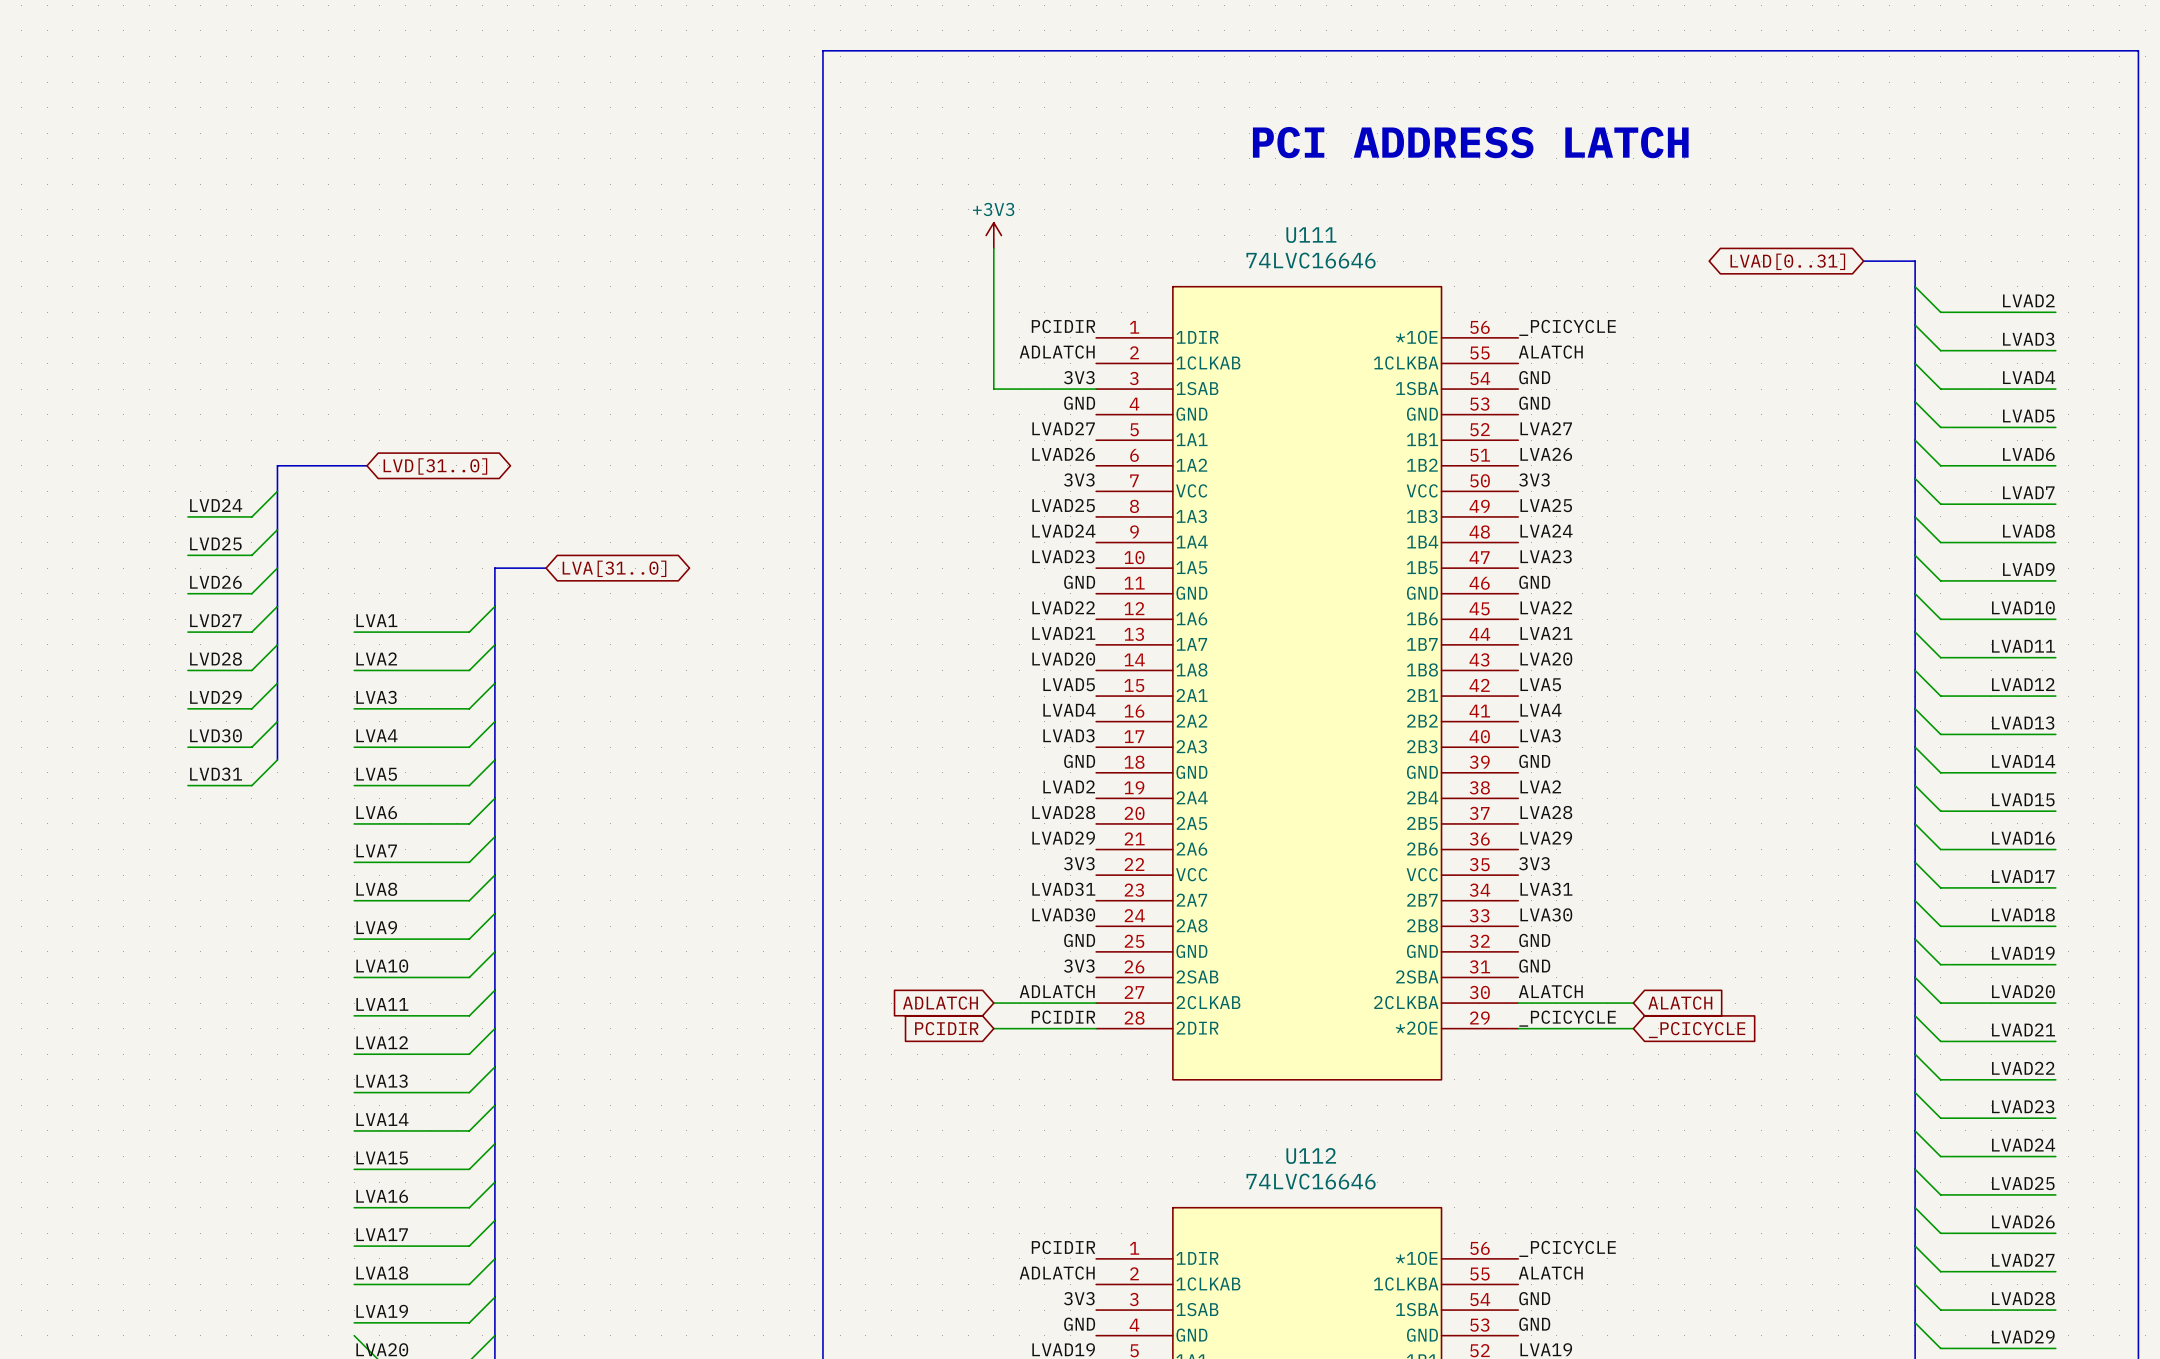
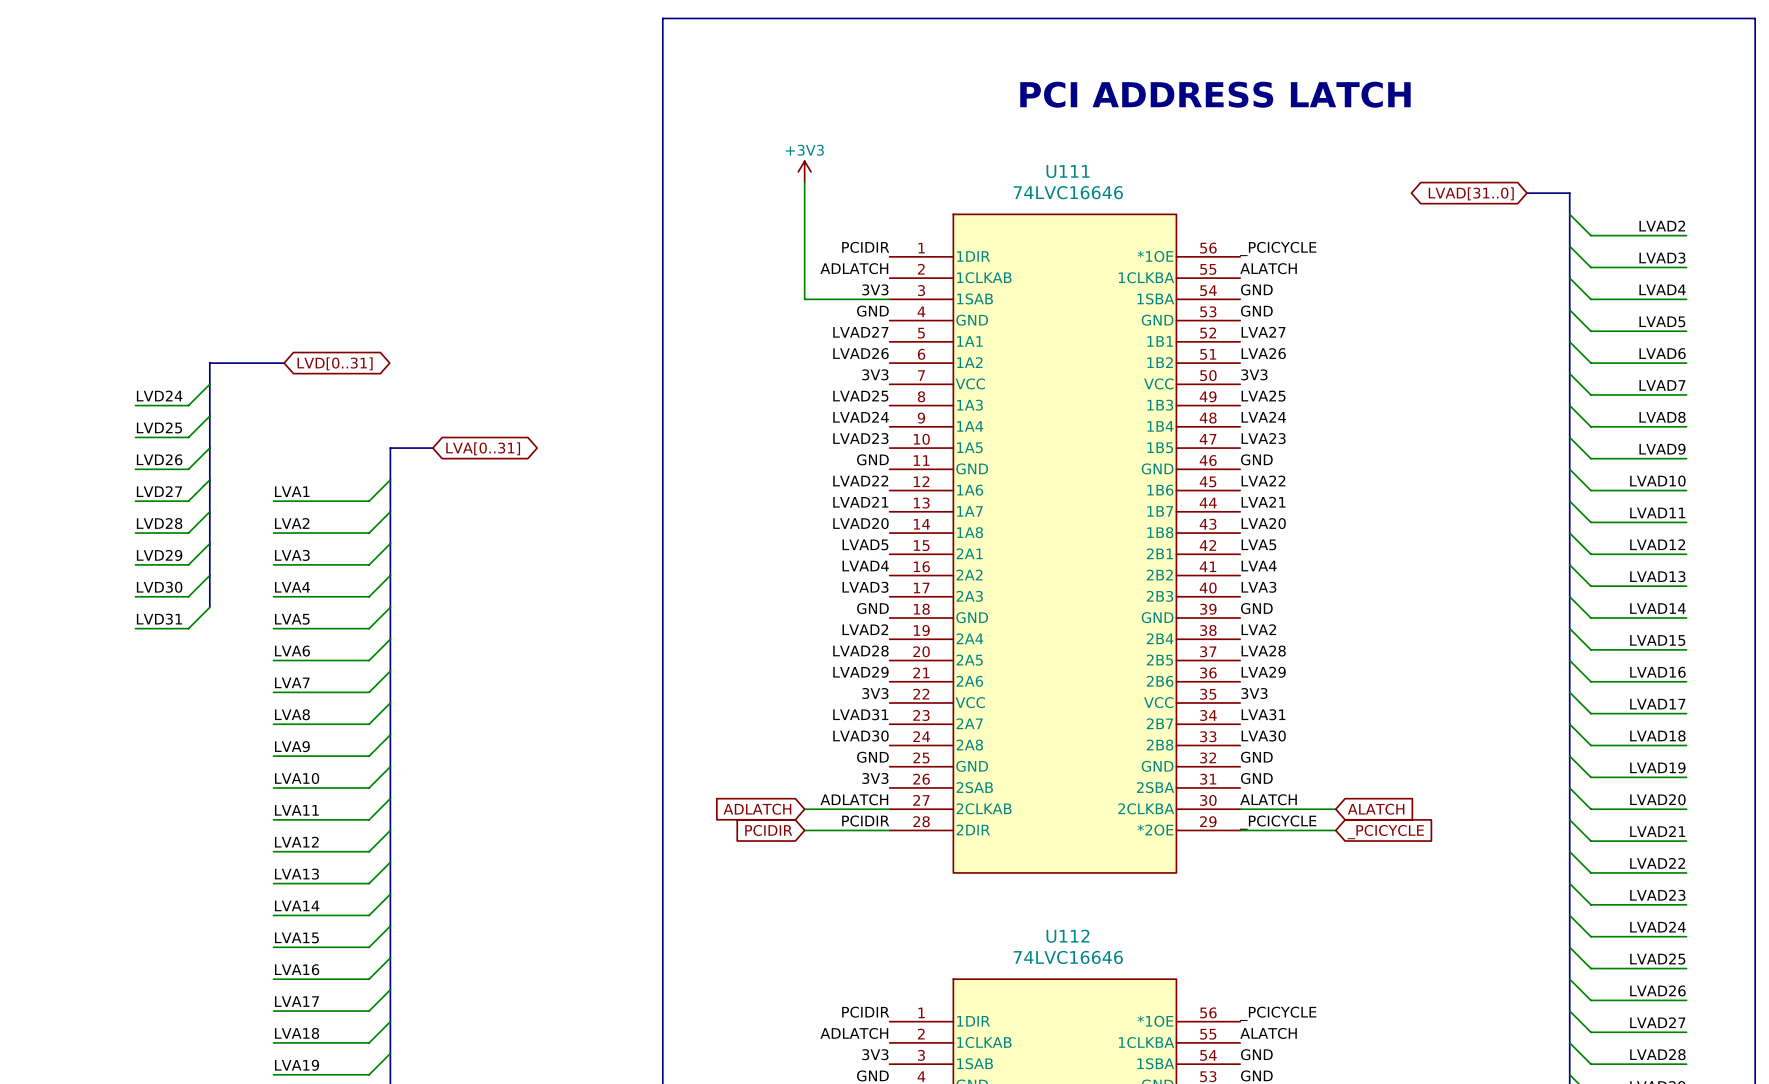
global label: LVAD[0..31] (1787, 261) -> LVAD[31..0] (1471, 193)
global label: LVD[31..0] (435, 466) -> LVD[0..31] (335, 363)
global label: LVA[31..0] (614, 568) -> LVA[0..31] (483, 448)

